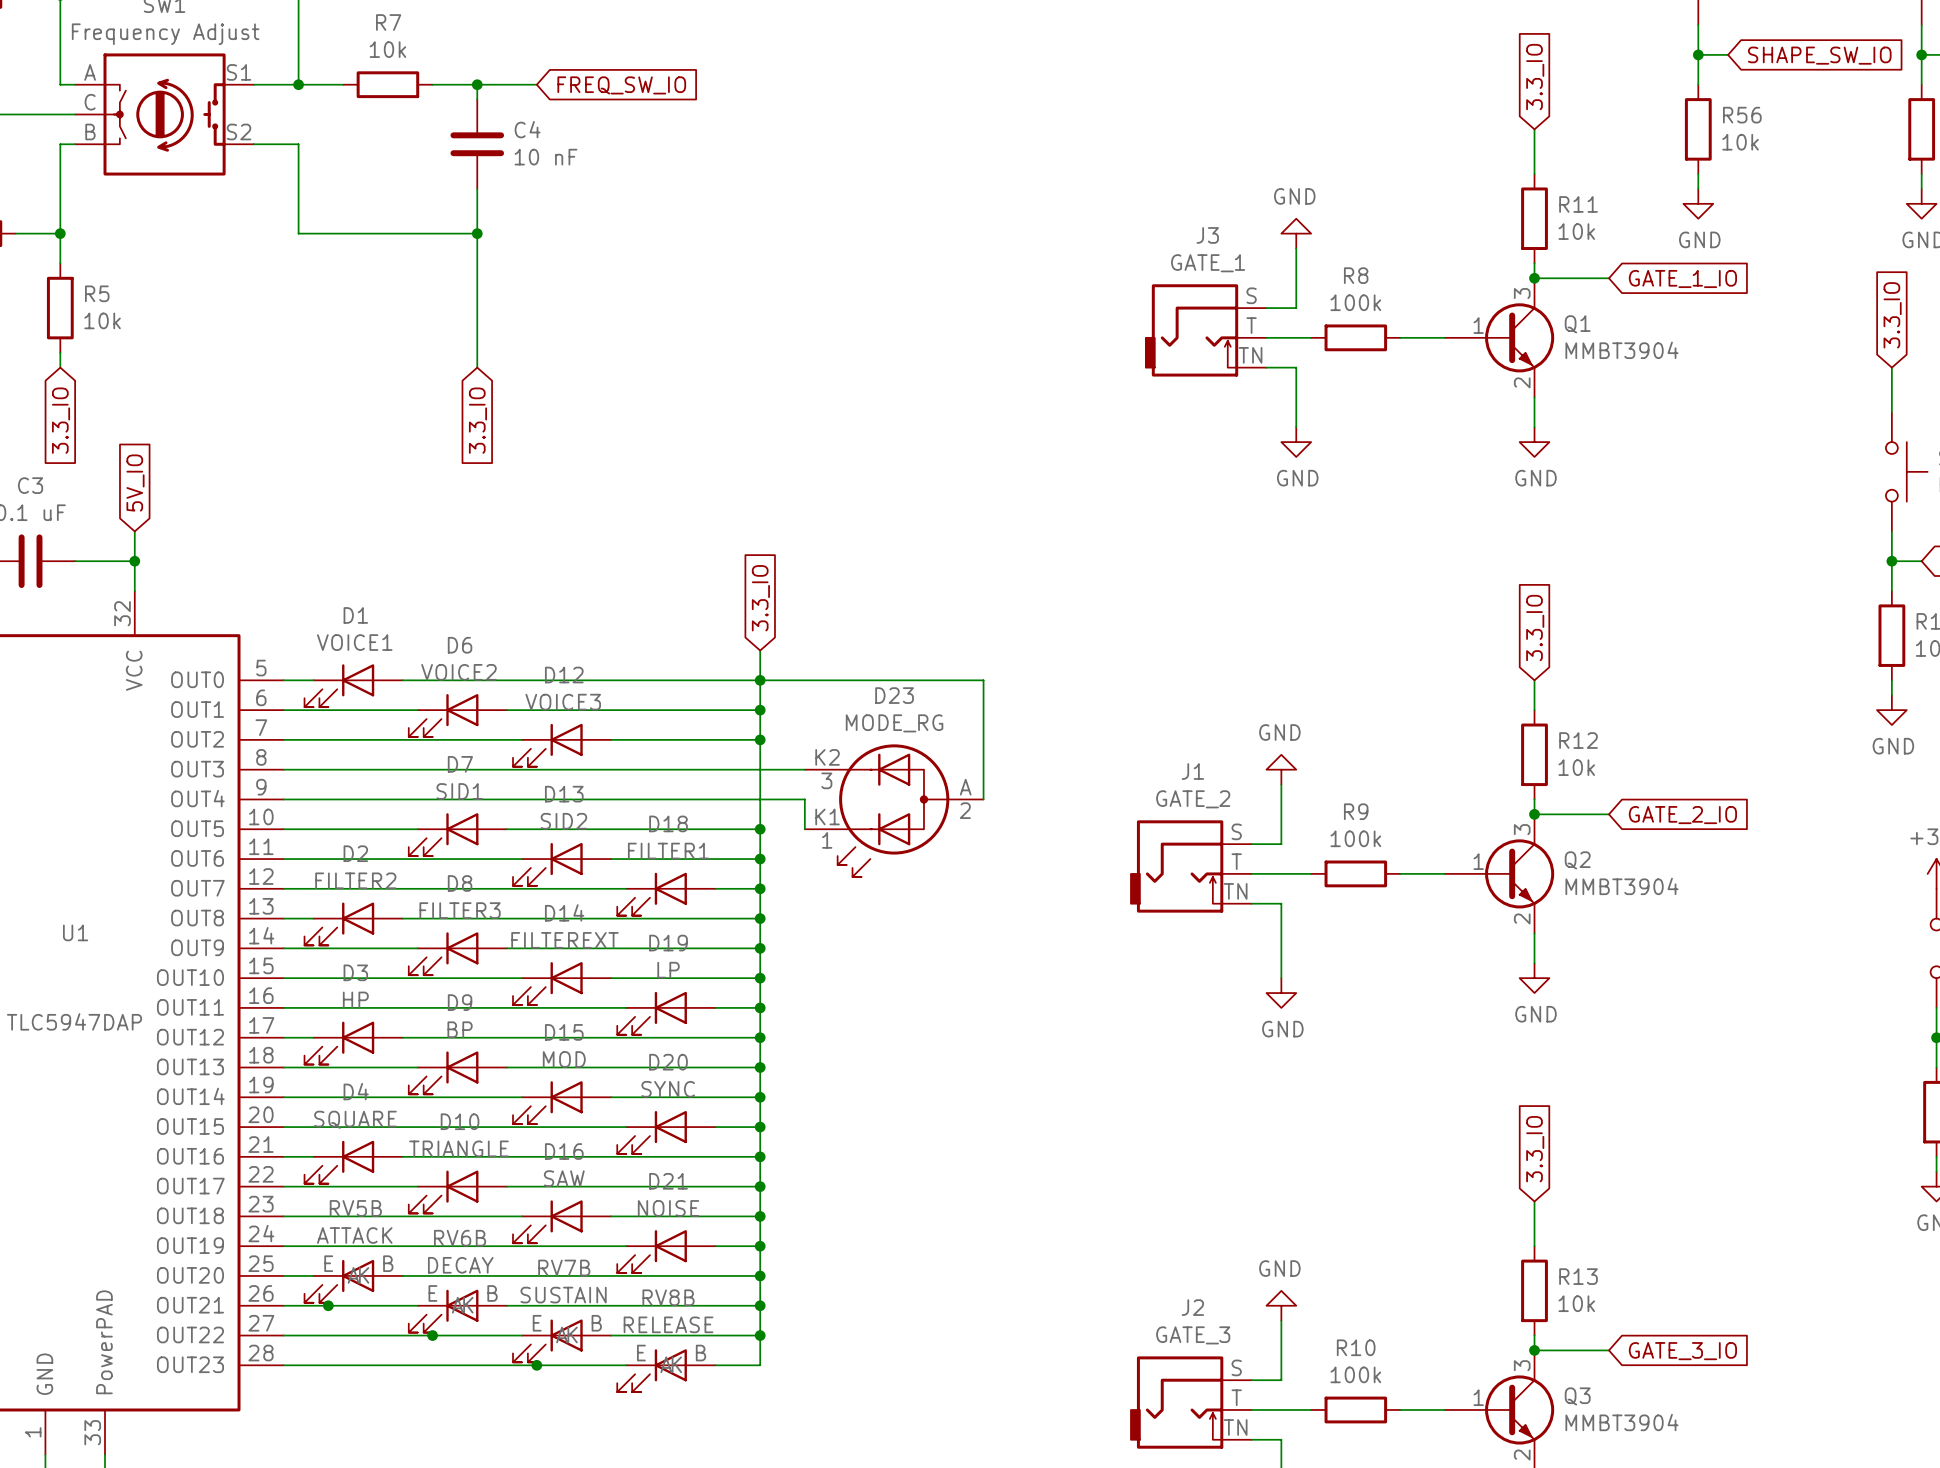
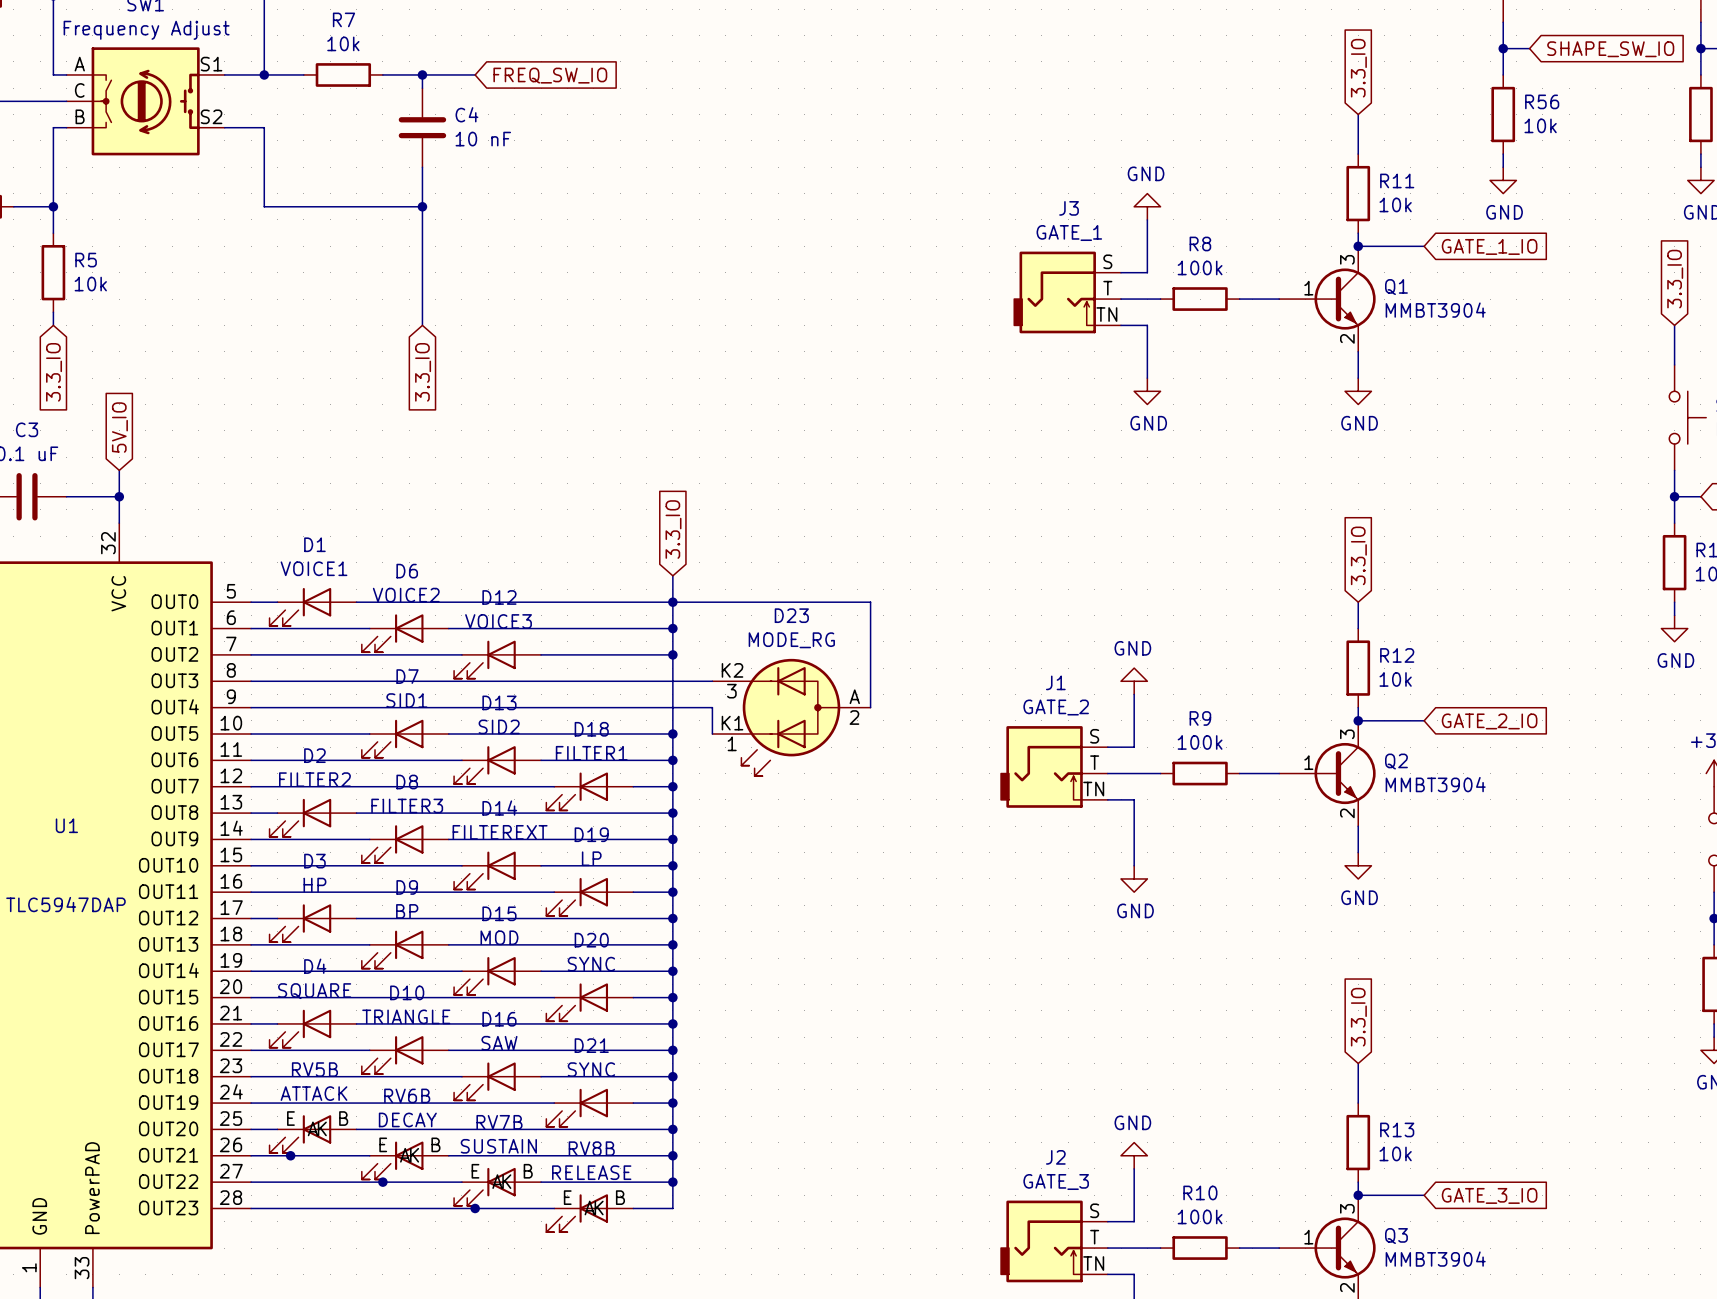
D21 value: NOISE (668, 1208) -> SYNC (591, 1069)

